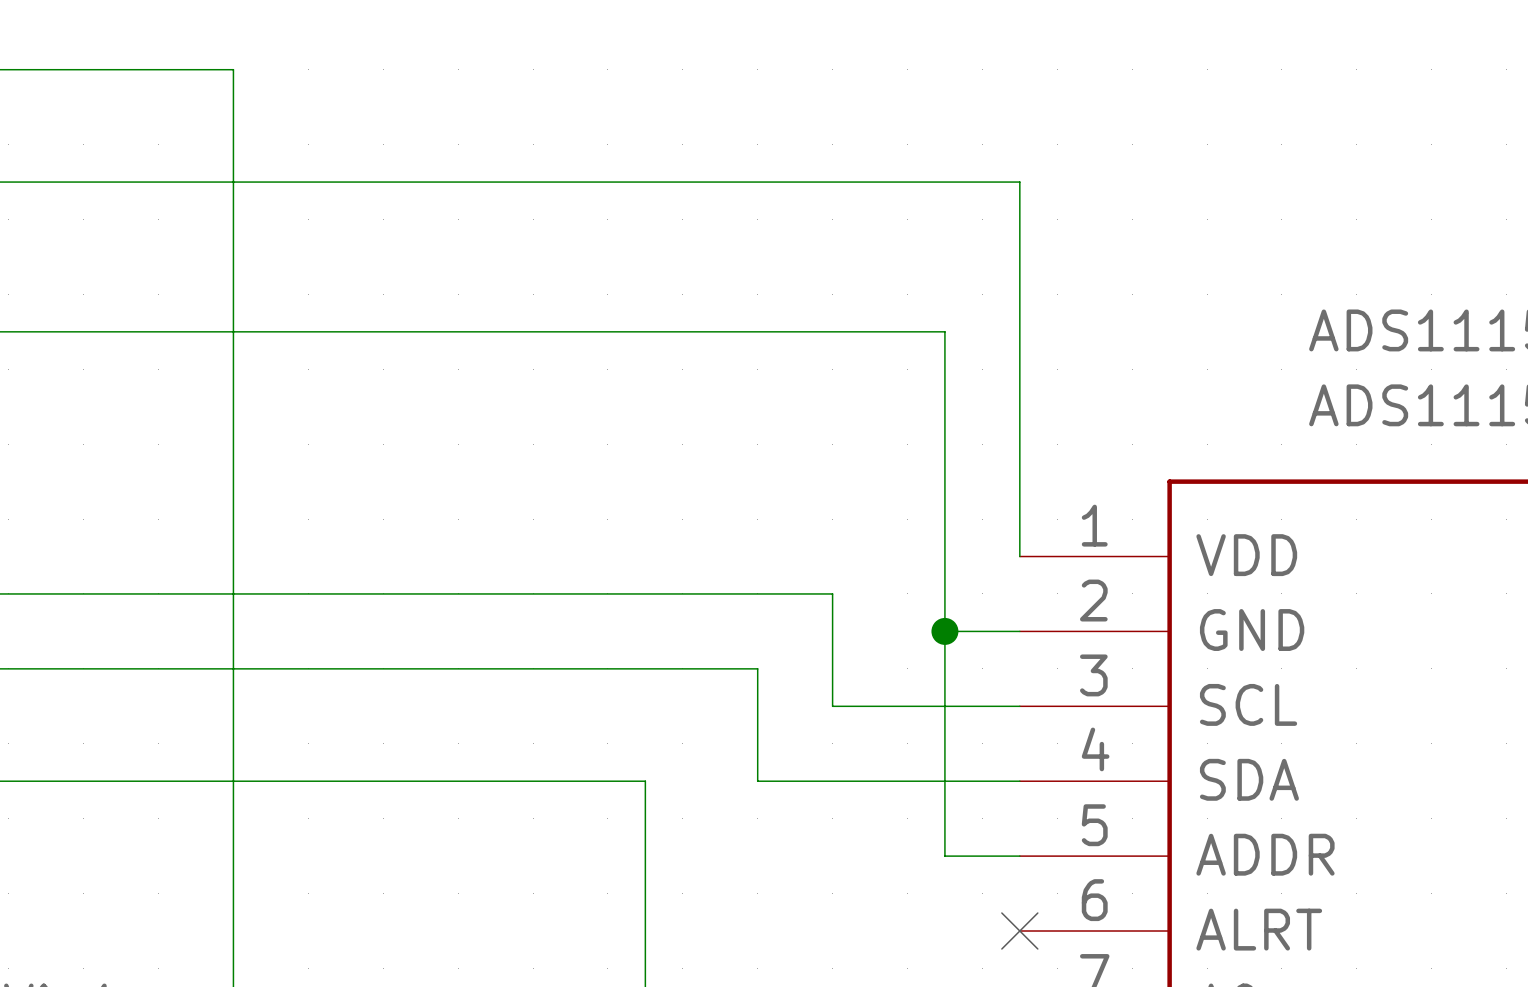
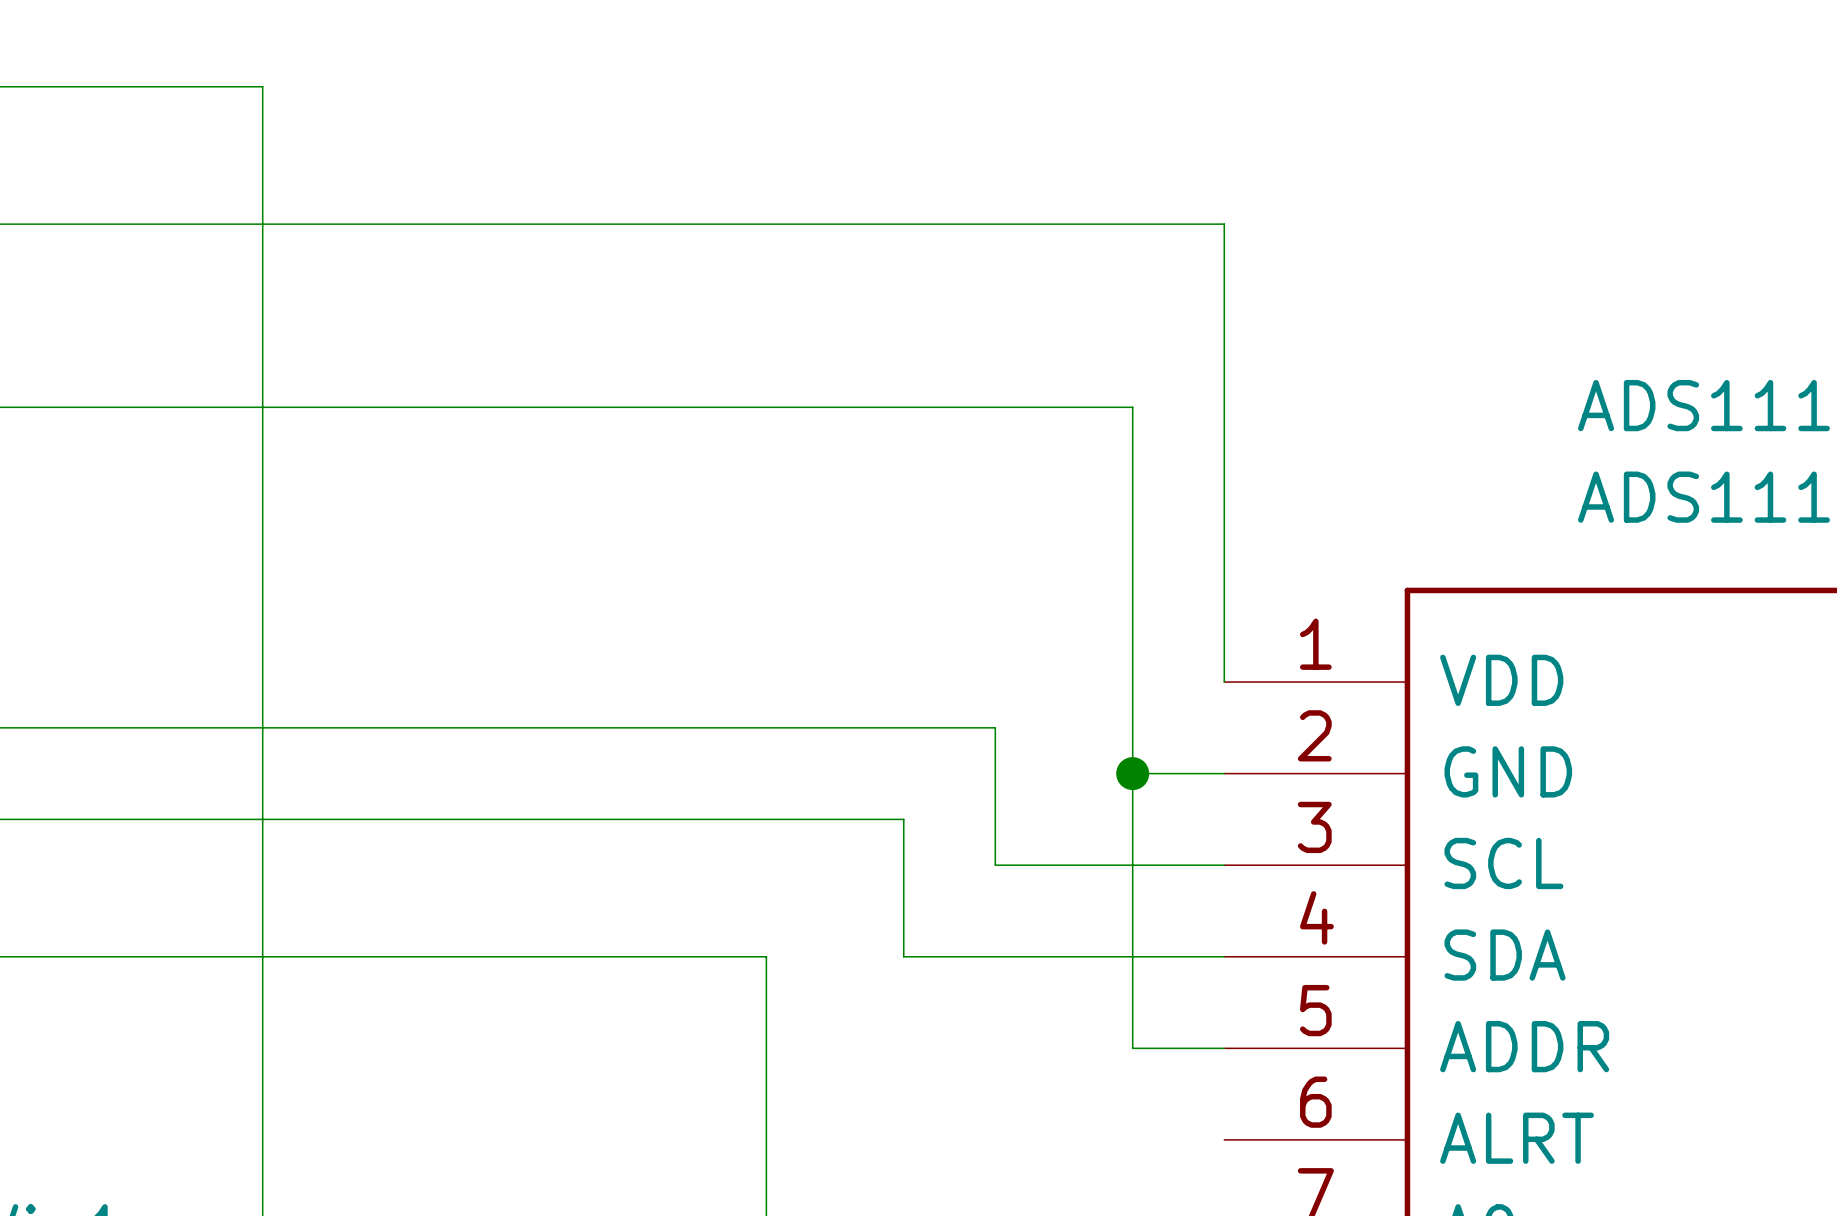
no-connect mark: (1019, 931) -> none

